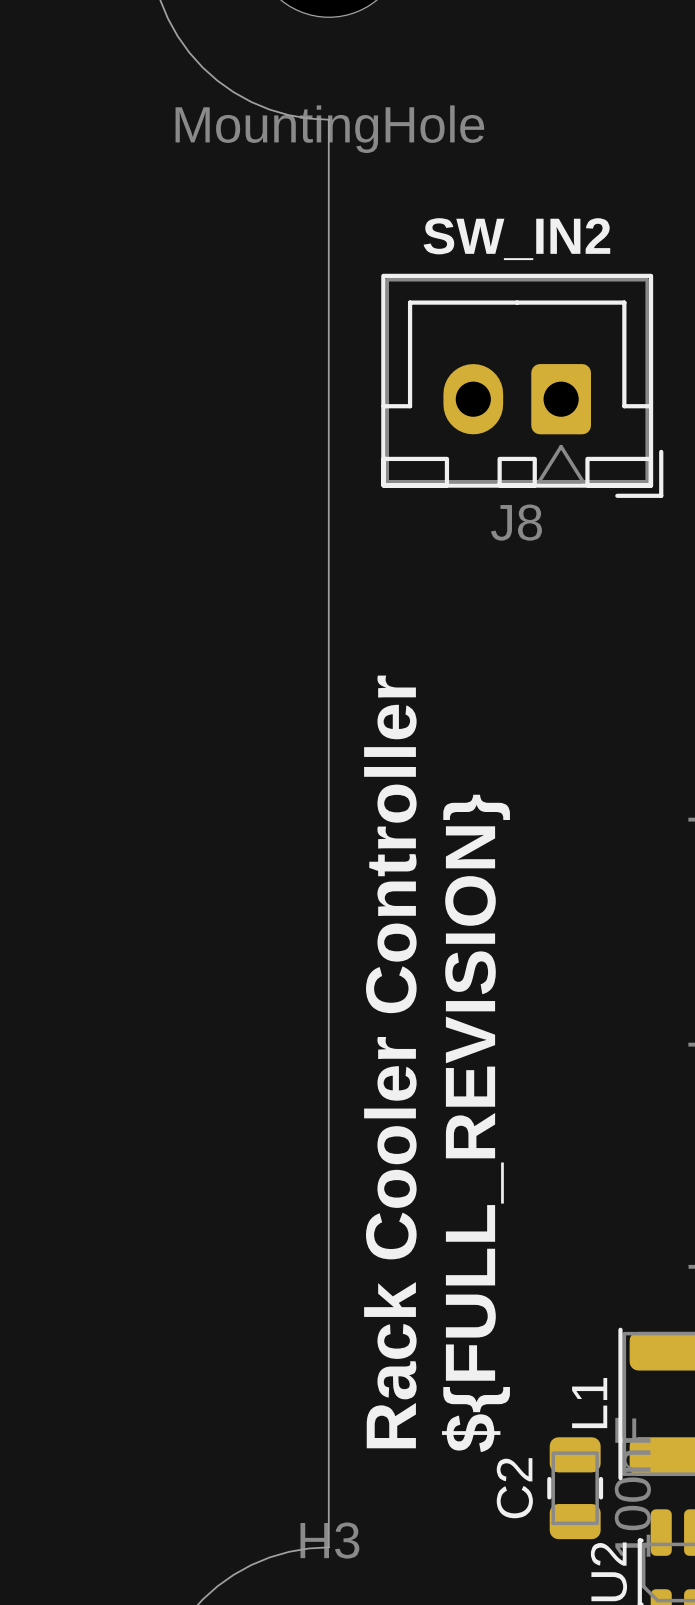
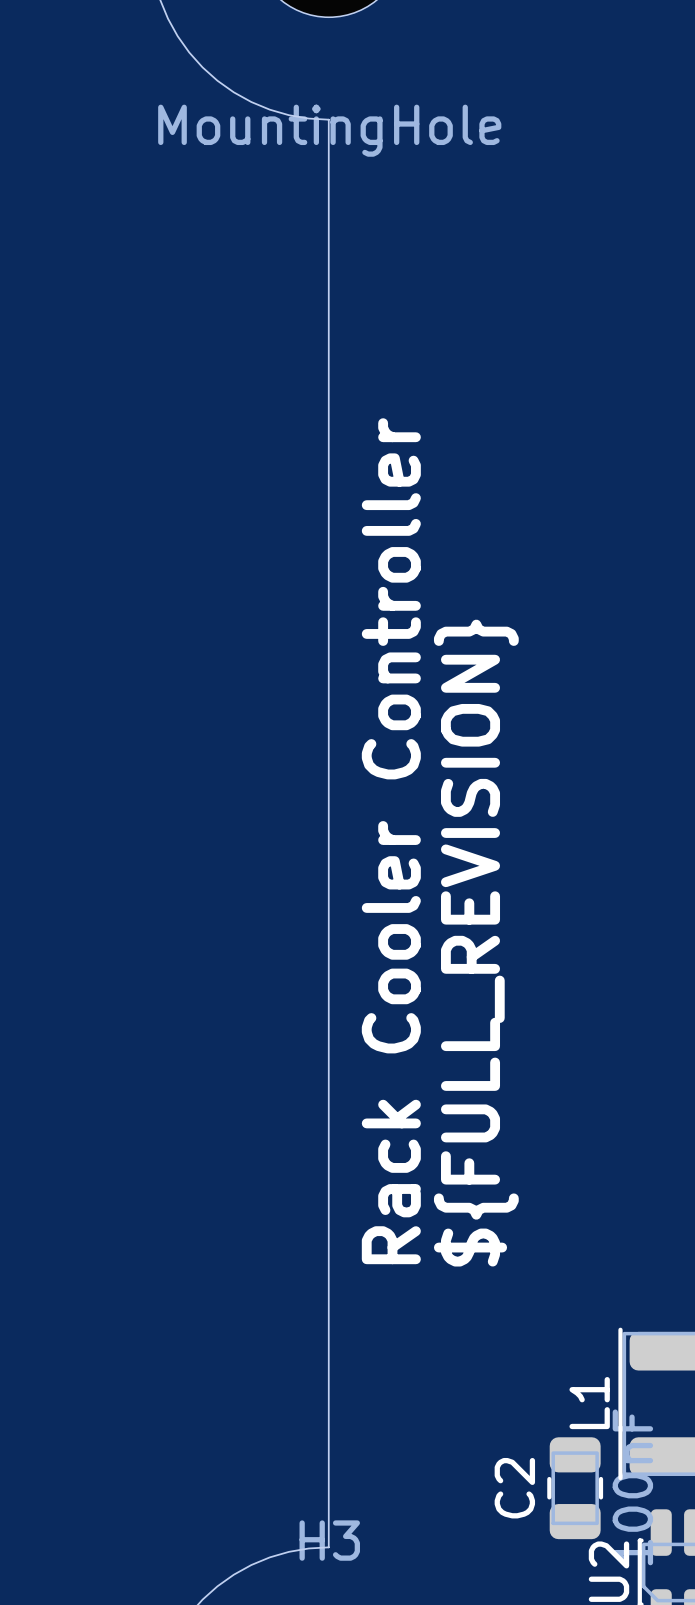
J8: SW_IN2 (522, 385) -> none
text position: Rack Cooler Controller (390, 1061) -> Rack Cooler Controller (391, 841)
text position: ${FULL_REVISION} (475, 1123) -> ${FULL_REVISION} (476, 943)

